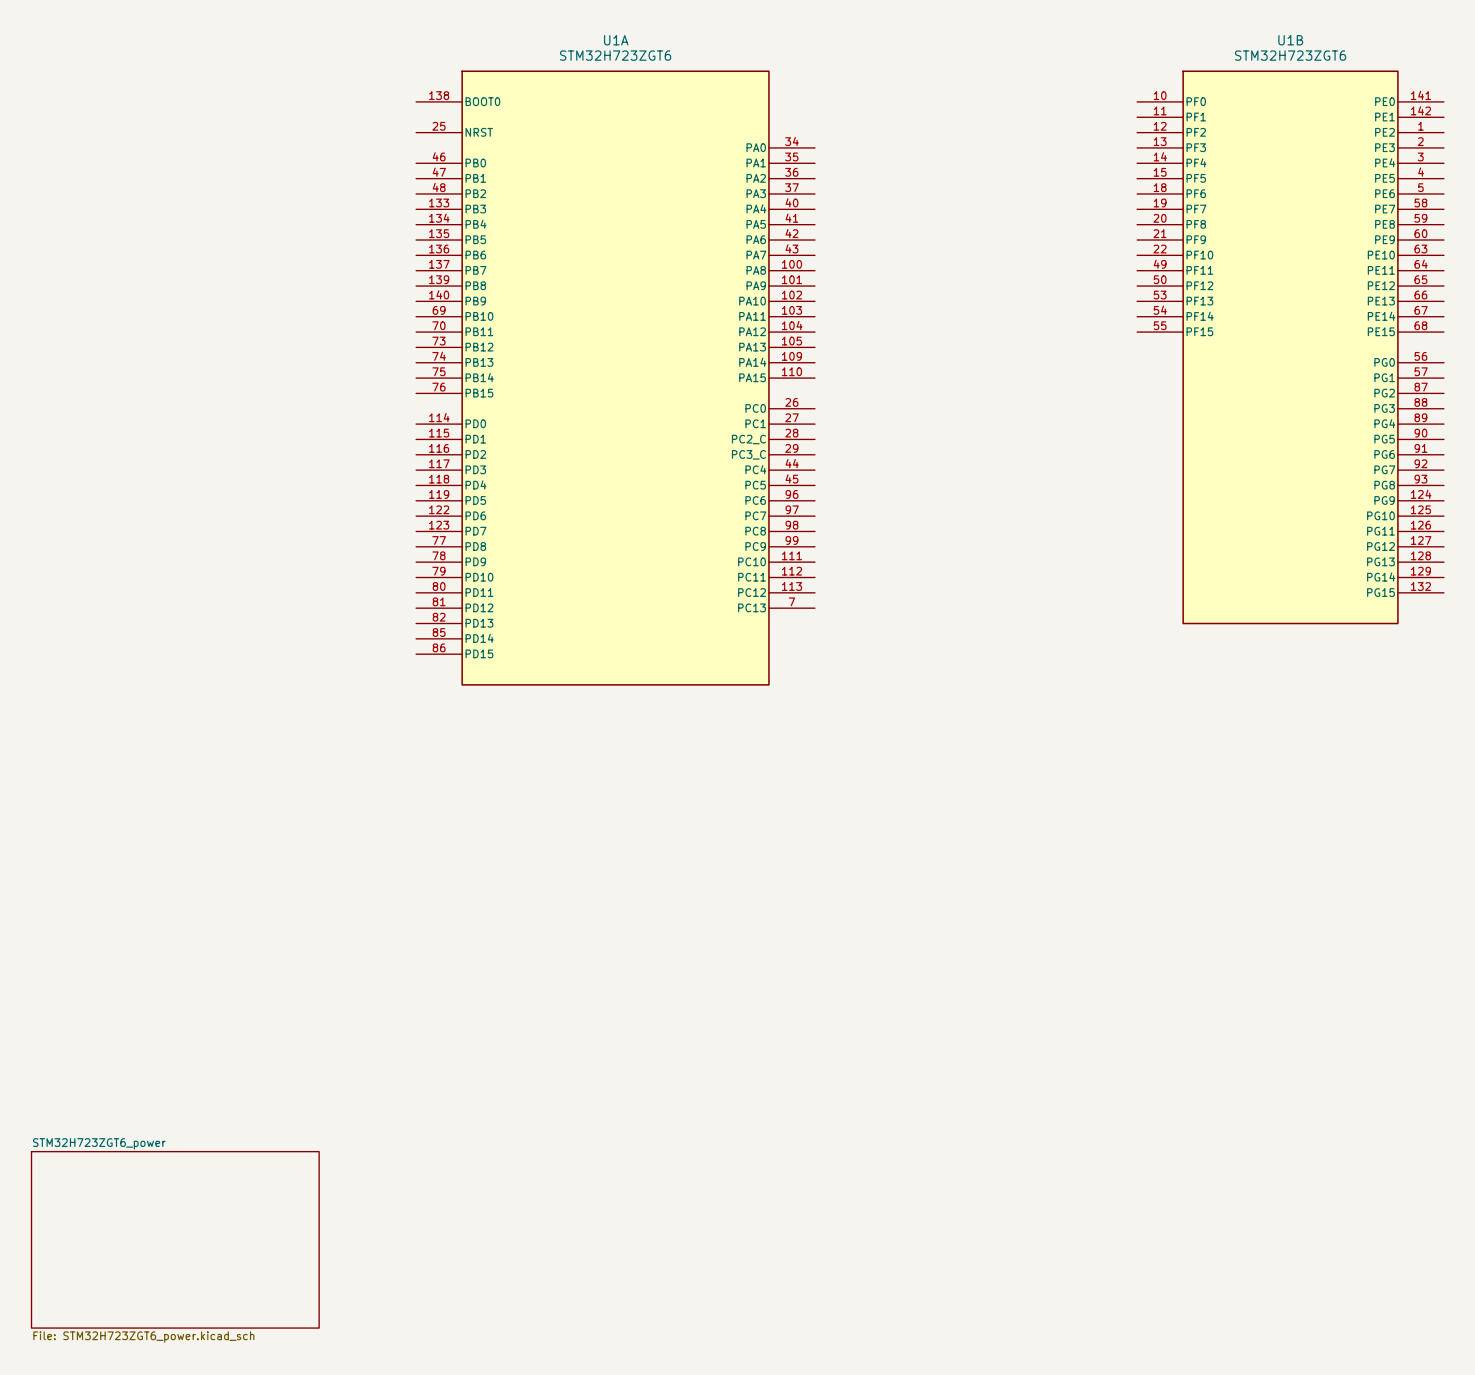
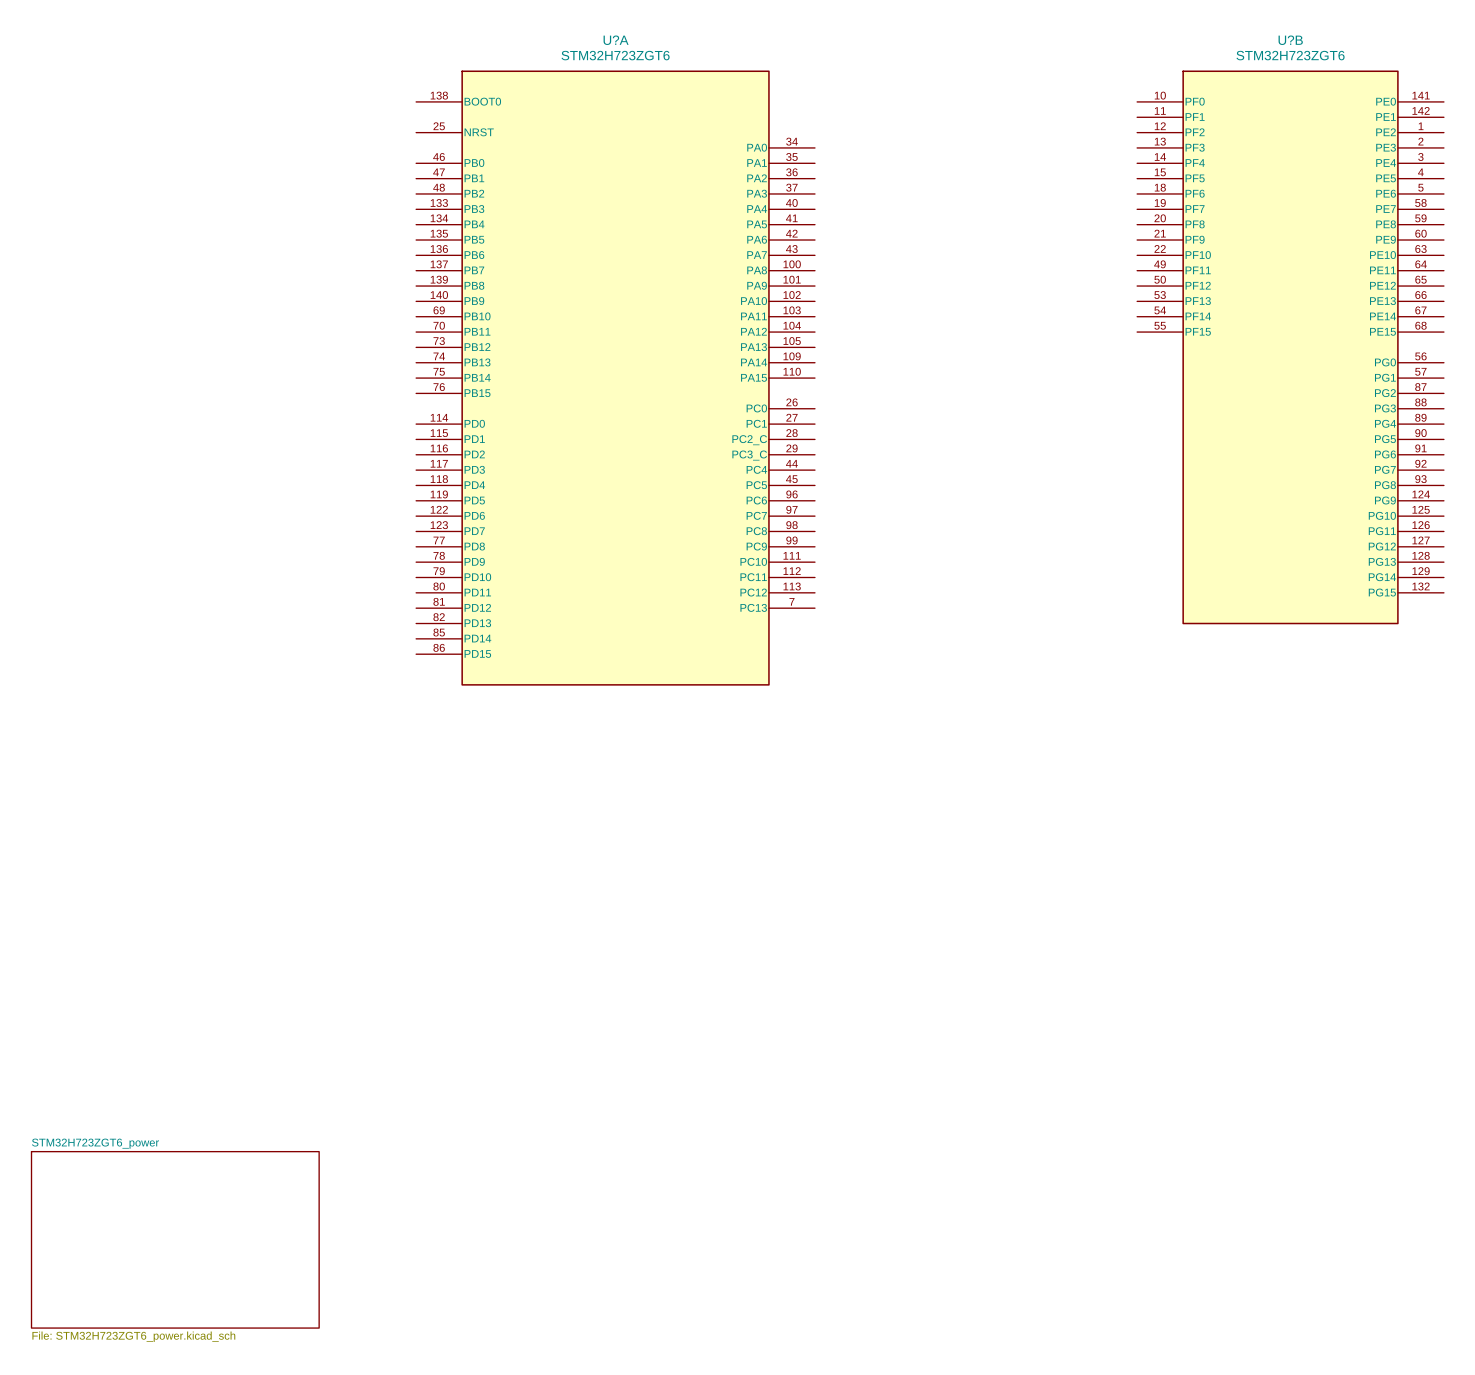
U1A name: U1A (616, 40) -> U?A (616, 40)
U1B name: U1B (1290, 40) -> U?B (1290, 40)

